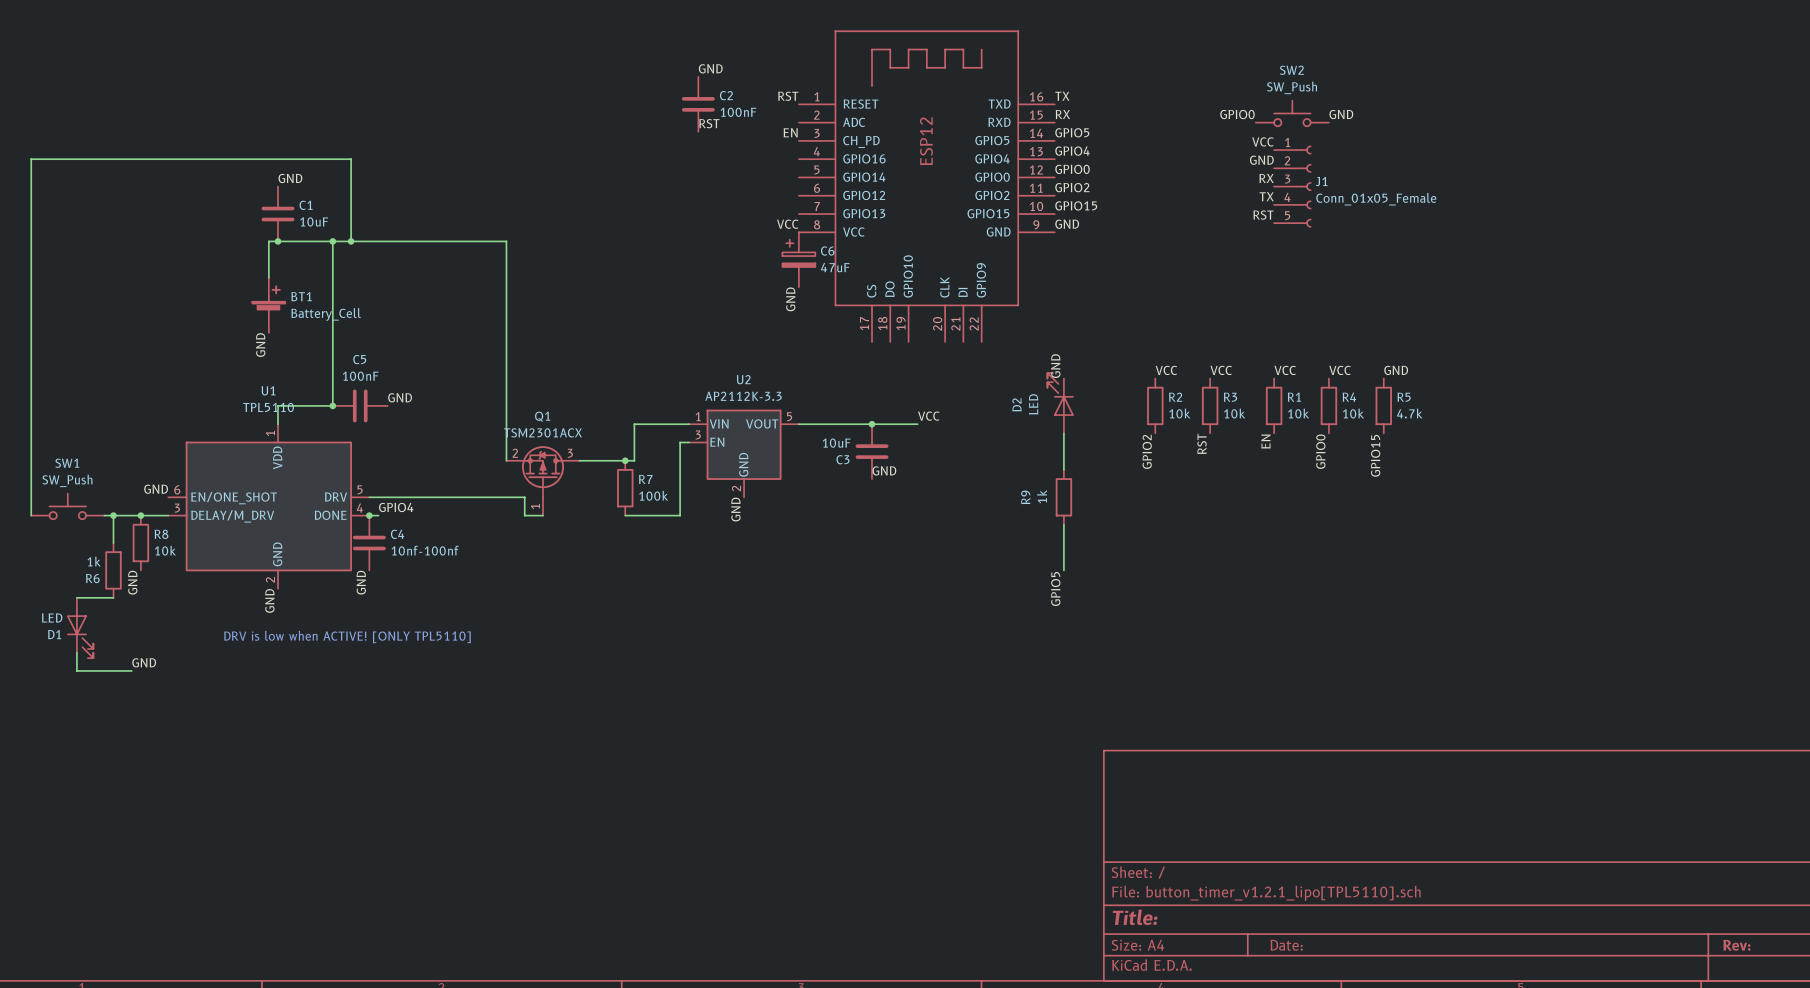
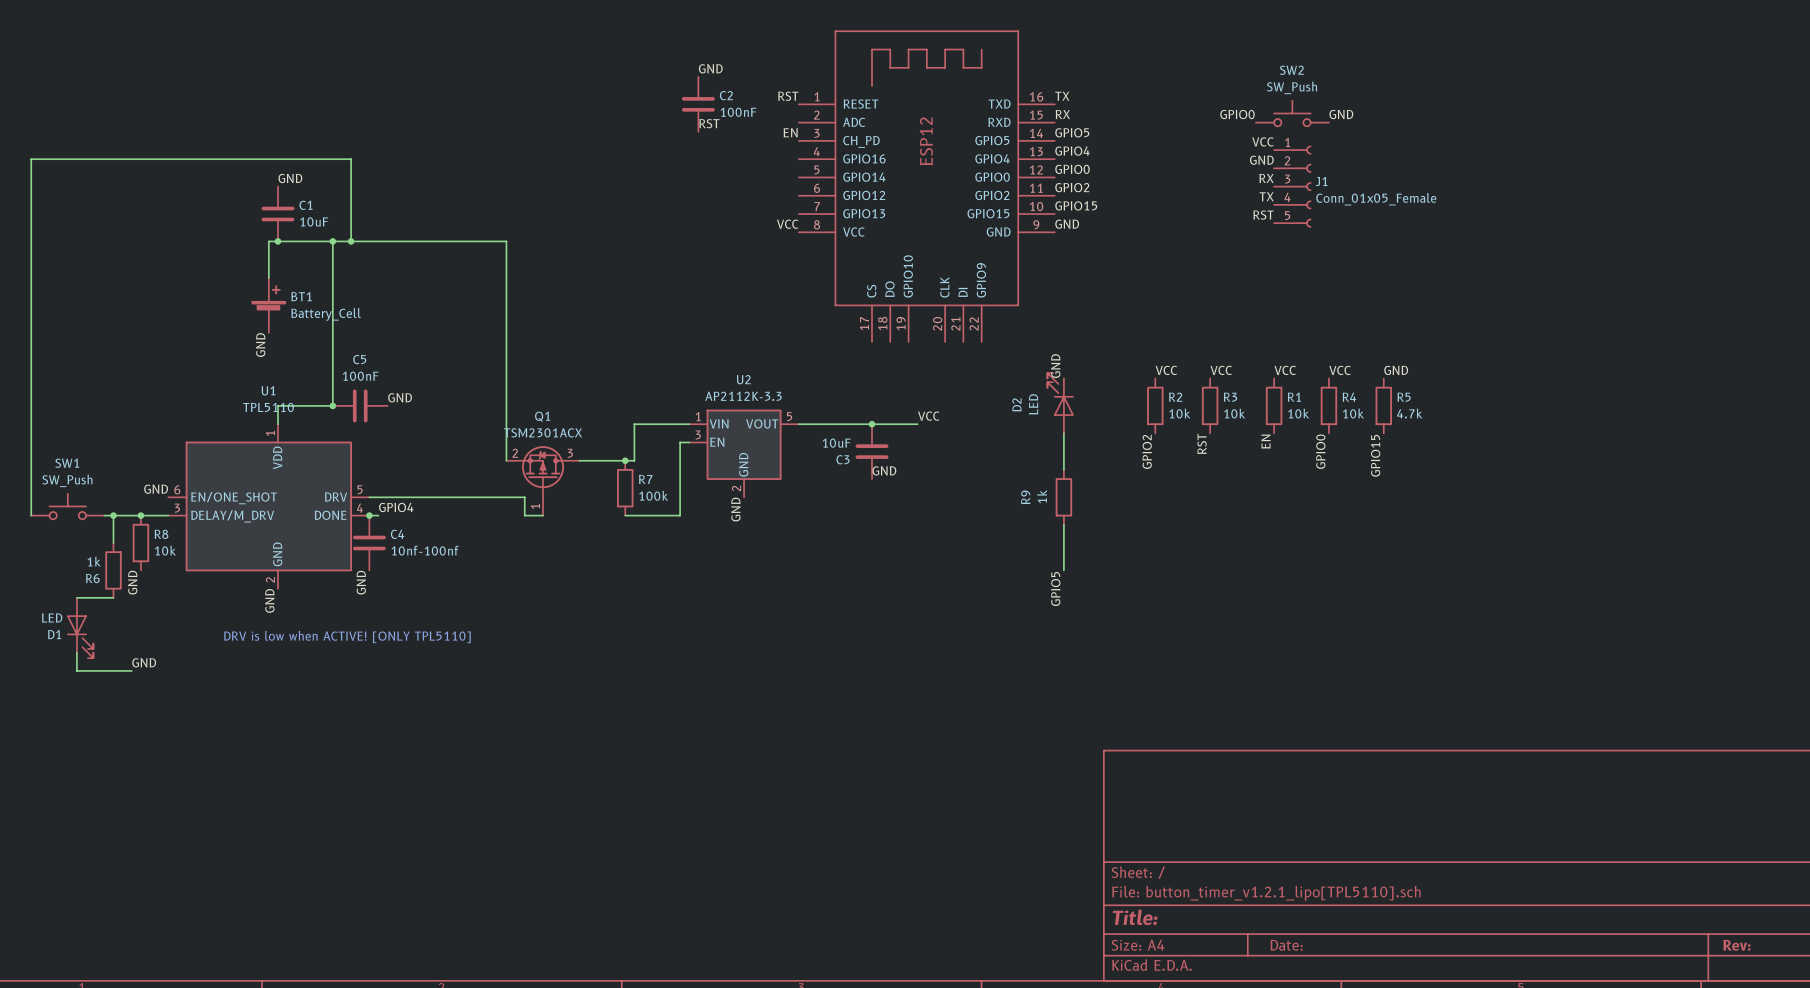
C6: 47uF (798, 259) -> none
label: GND (790, 299) -> none

